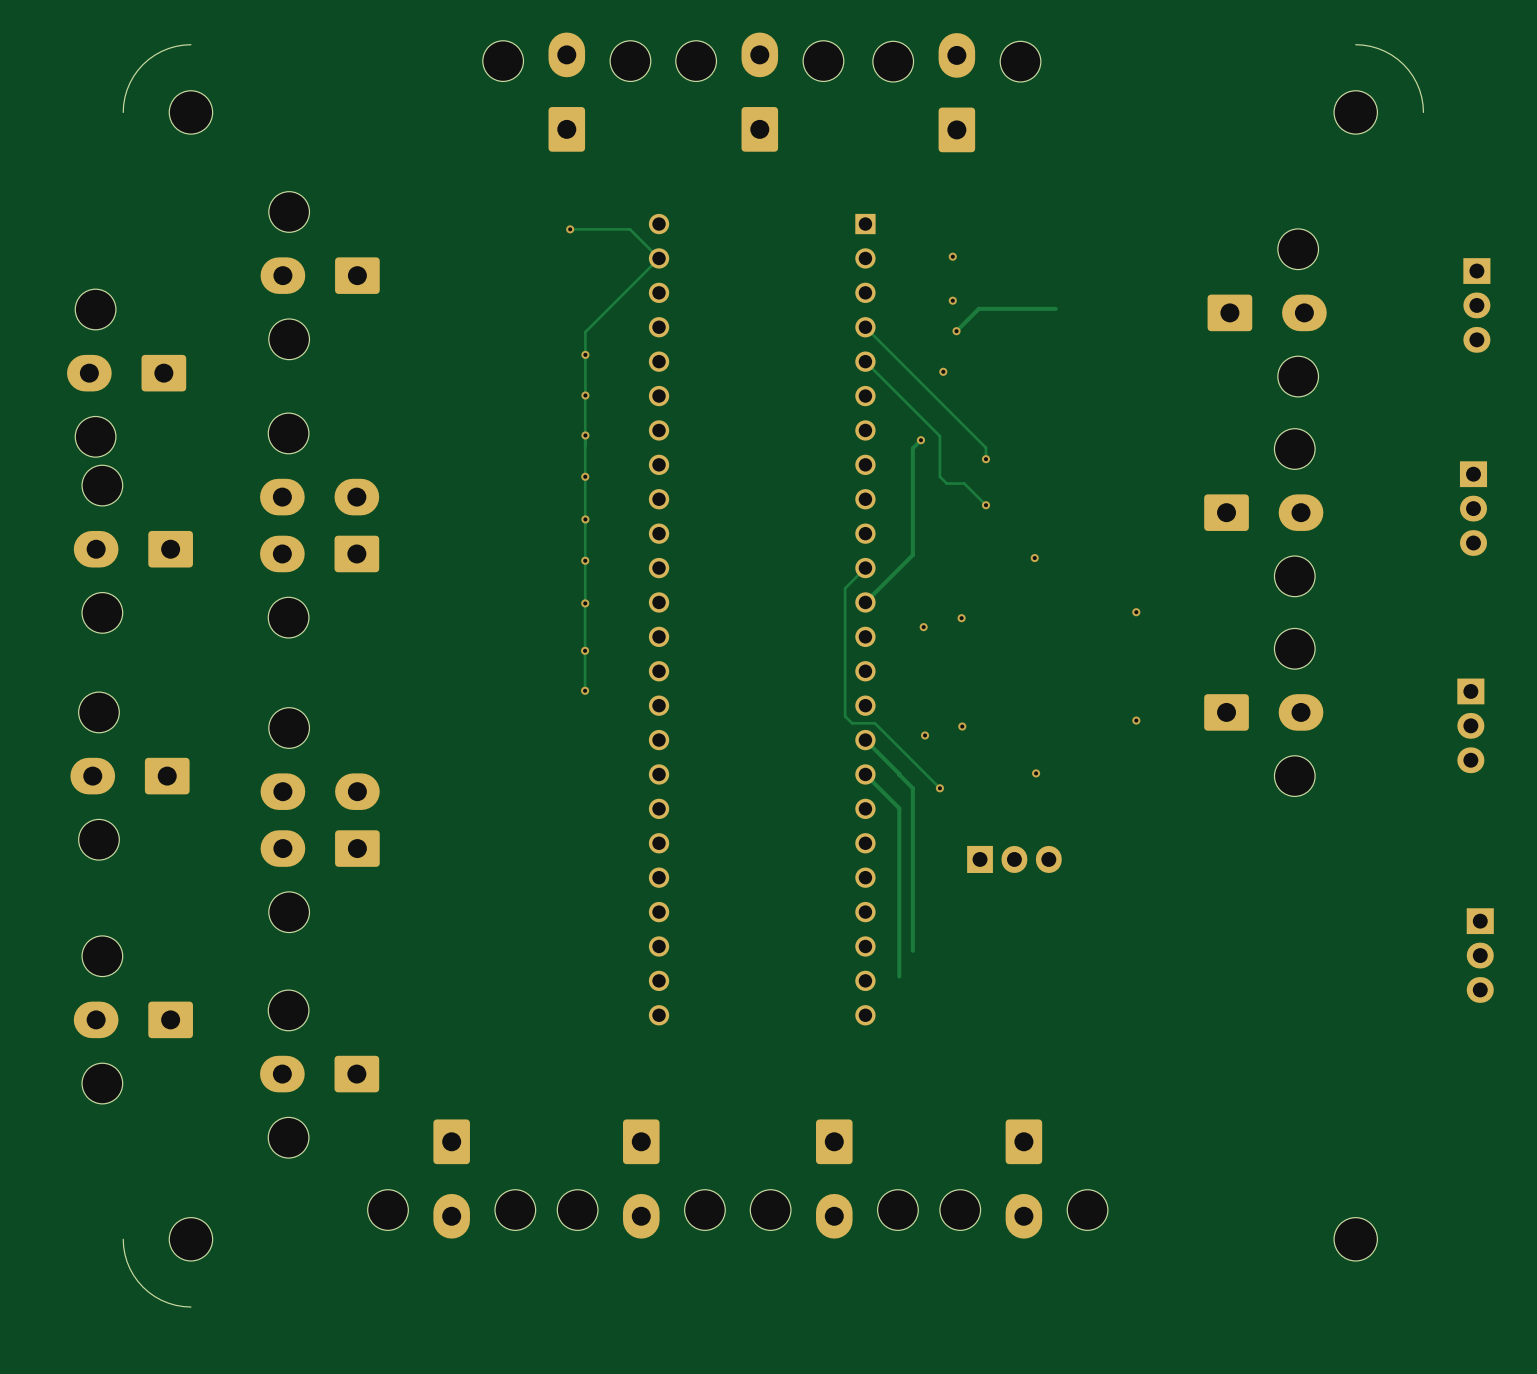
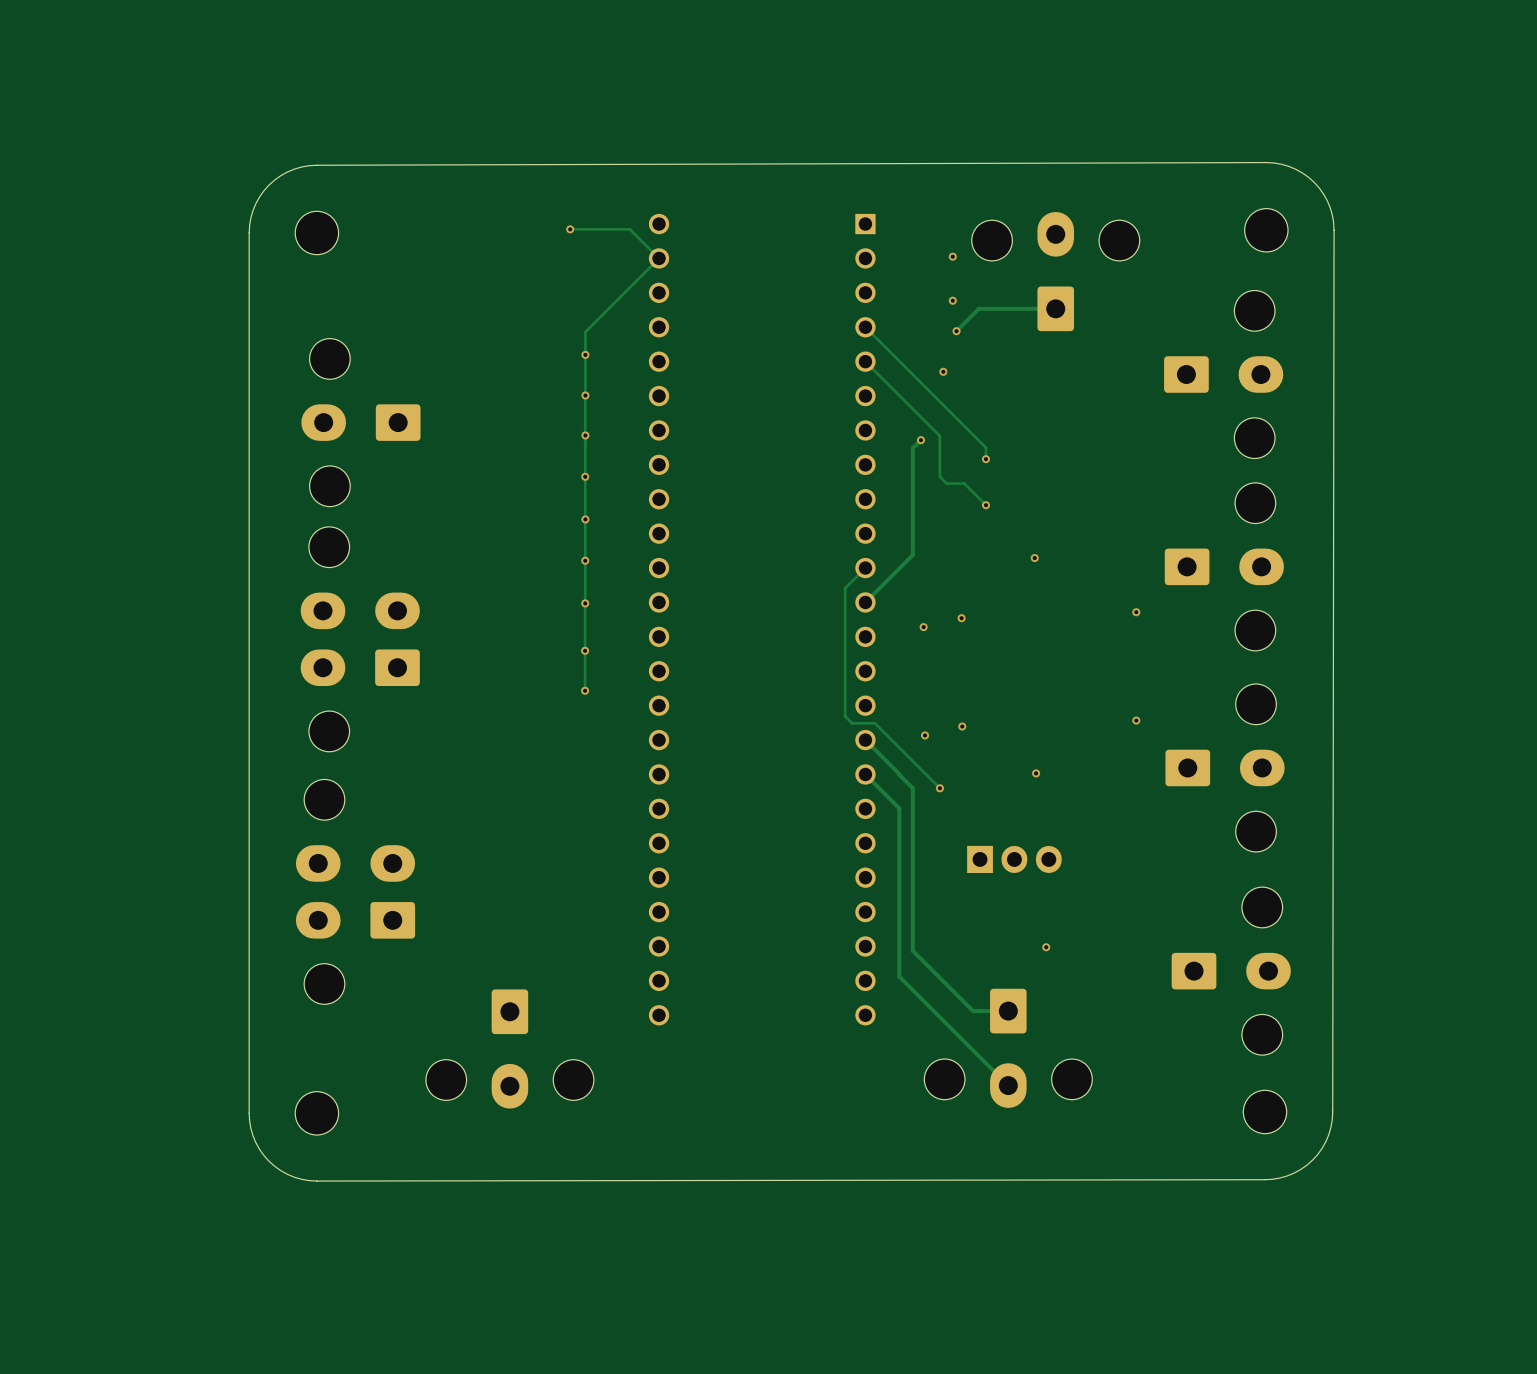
board edge: (190, 44) (168, 48) (154, 55) (143, 64) (133, 76) (127, 90) (123, 112) -> none
board edge: (1355, 44) (1378, 48) (1391, 55) (1403, 64) (1413, 76) (1419, 90) (1423, 112) -> none
part: (566, 92) -> none
part: (759, 92) -> none
part: (956, 92) -> none
part position: (190, 112) -> (316, 232)
part position: (1355, 112) -> (1266, 230)
board edge: none -> (1266, 162) (316, 165) (294, 169) (280, 175) (269, 185) (259, 196) (252, 210) (249, 232) (249, 1113) (250, 1128) (255, 1142) (269, 1161) (287, 1174) (301, 1179) (316, 1181) (1264, 1179) (1280, 1178) (1294, 1173) (1312, 1159) (1322, 1148) (1328, 1134) (1332, 1111) (1334, 230) (1330, 207) (1323, 194) (1314, 182) (1295, 169) (1281, 164) (1266, 162)
part: none -> (1055, 271)
part: (320, 275) -> none
part: (1476, 305) -> none
part: (1267, 312) -> none
part: (126, 373) -> none
part: none -> (1223, 374)
part: none -> (360, 422)
part: (1473, 508) -> none
part position: (1263, 512) -> (1224, 566)
part: (319, 525) -> none
part: (133, 549) -> none
part: none -> (360, 639)
part position: (1263, 712) -> (1225, 767)
part: (1470, 725) -> none
part: (130, 776) -> none
part position: (320, 820) -> (355, 891)
via: none -> (1046, 947)
track: none -> (912, 950) (973, 1011) (1008, 1011)
part: (1480, 955) -> none
part: none -> (1231, 971)
track: none -> (899, 976) (1008, 1085)
part: (133, 1019) -> none
part: none -> (1008, 1048)
part: none -> (509, 1049)
part: (319, 1074) -> none
part: (451, 1179) -> none
part: (641, 1179) -> none
part: (834, 1179) -> none
part: (1023, 1179) -> none
board edge: (123, 1239) (127, 1261) (133, 1275) (143, 1287) (154, 1296) (168, 1303) (190, 1307) -> none
part position: (190, 1239) -> (316, 1113)
part position: (1355, 1239) -> (1264, 1111)

